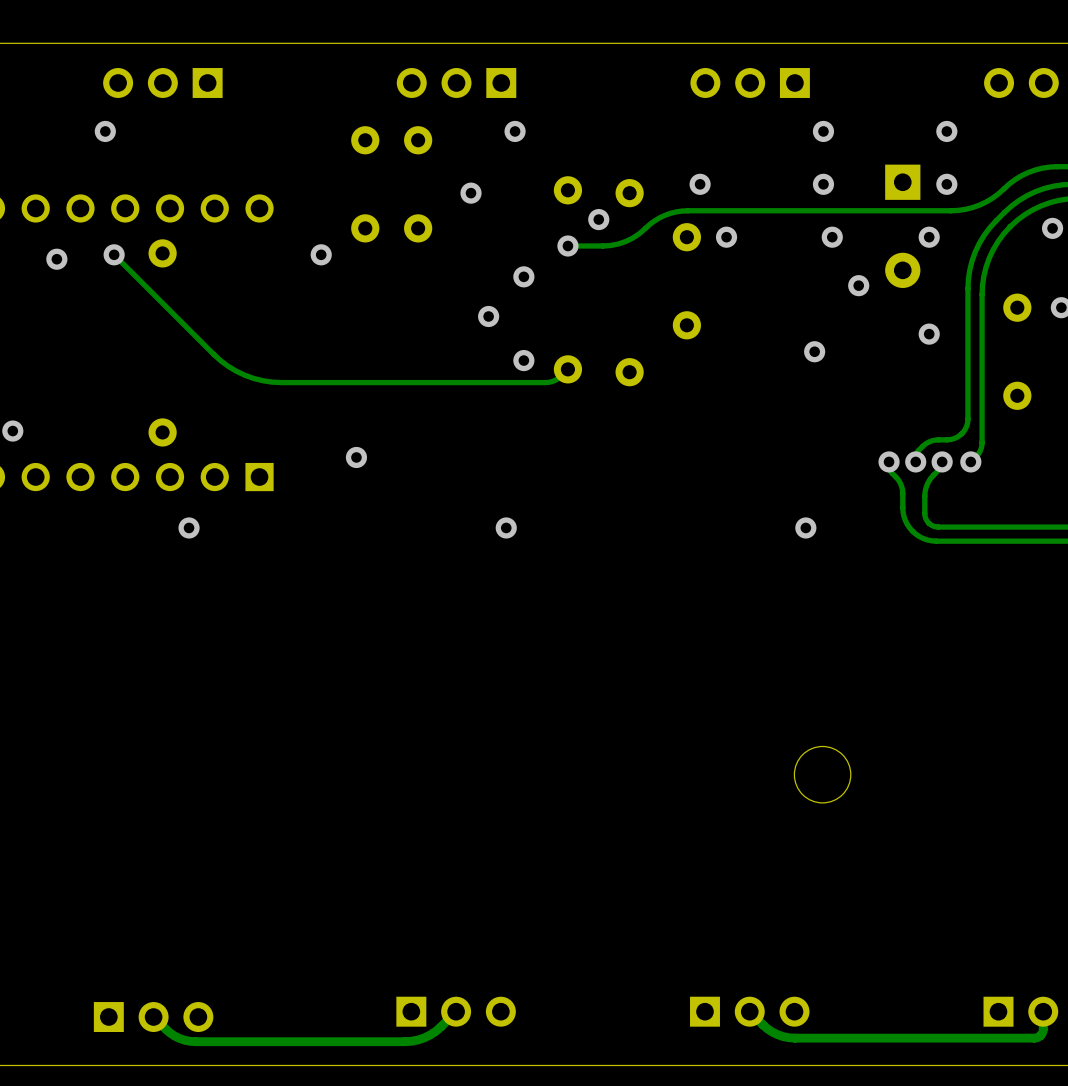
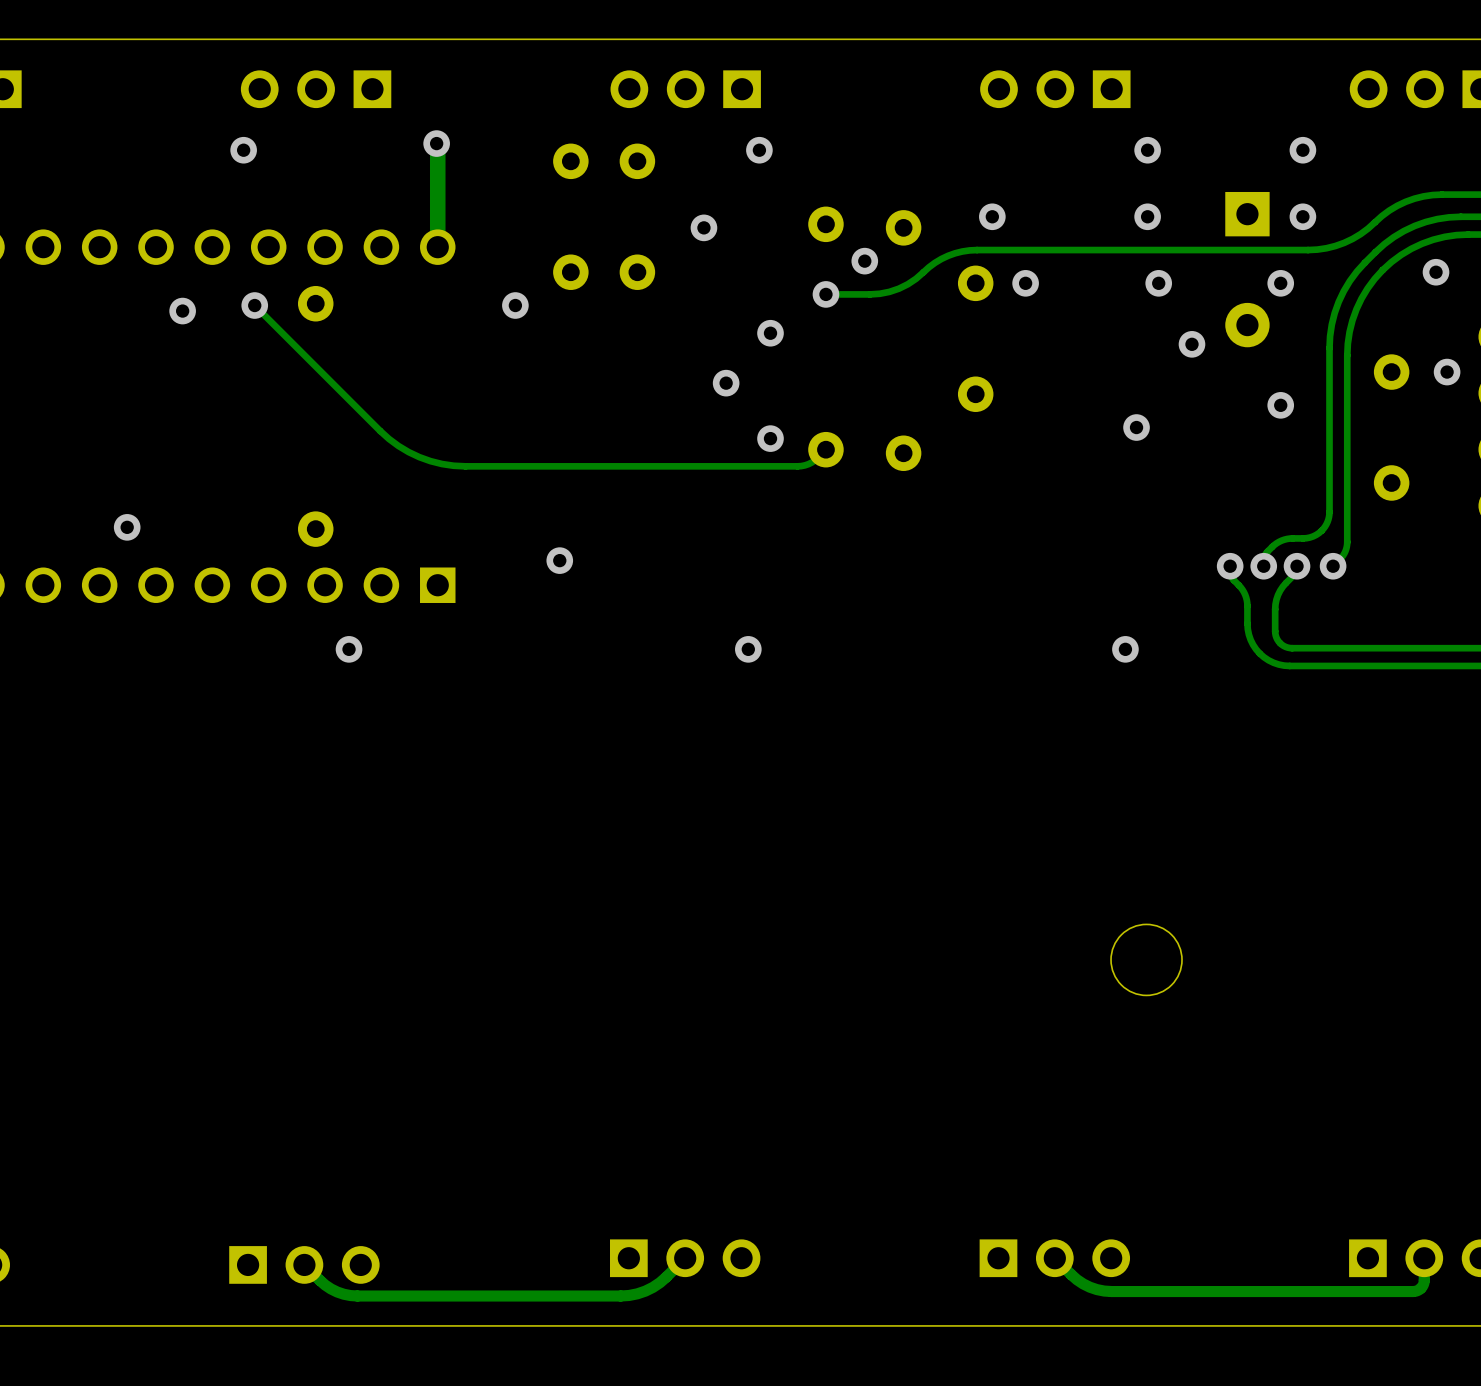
track: none -> (436, 143) (437, 247)
via: none -> (436, 143)

